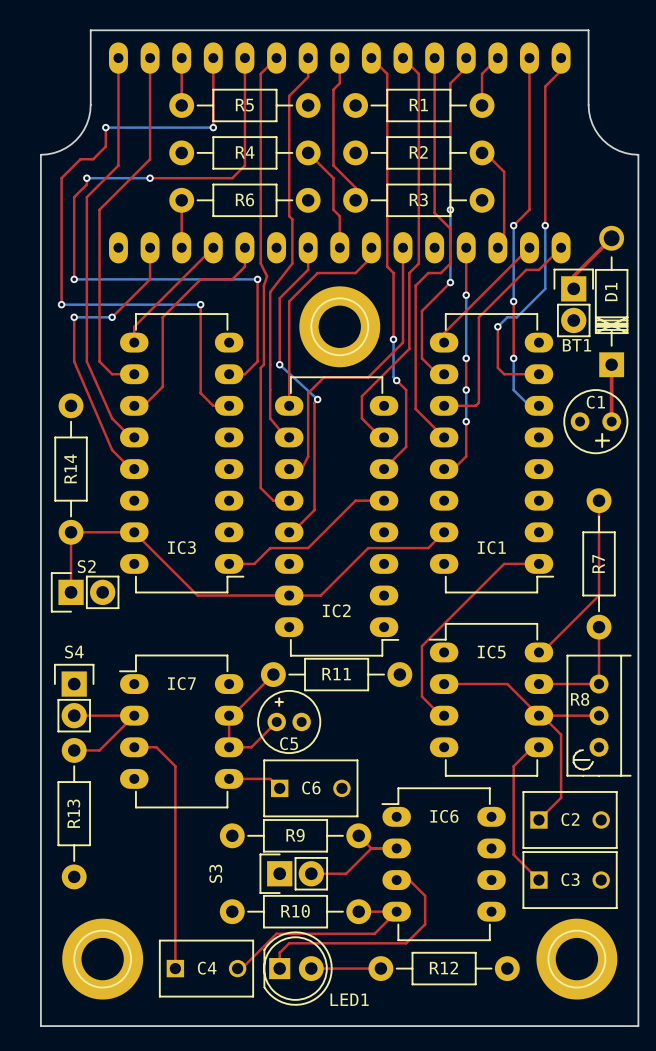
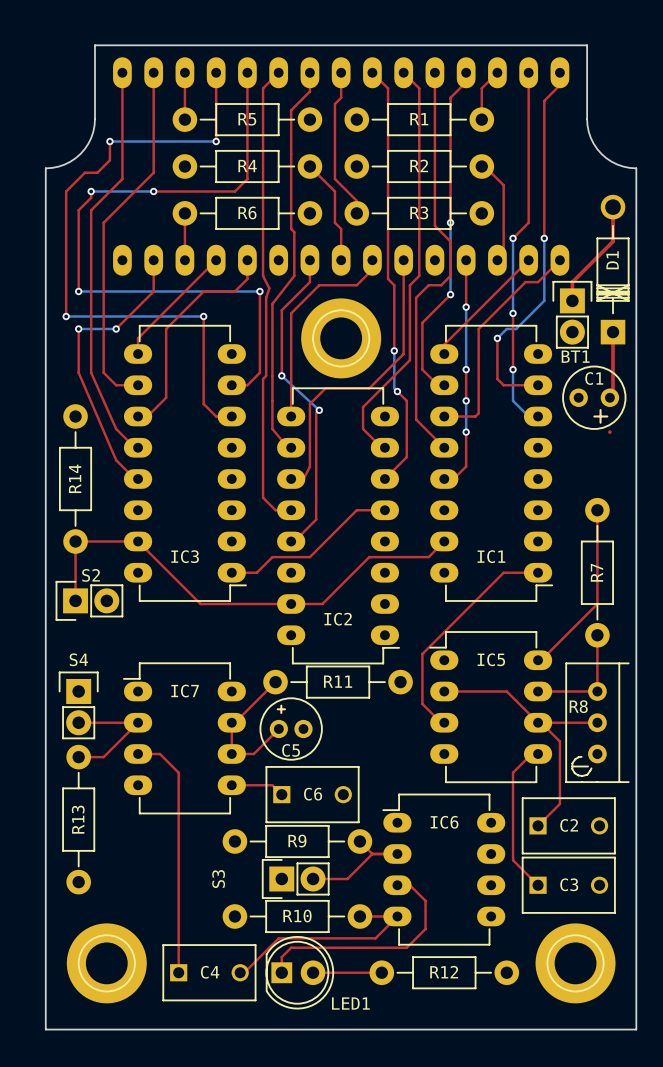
top track: (611, 238) (573, 276) -> (613, 207) (613, 241) (572, 282) (572, 288)
D1 position: (611, 301) -> (613, 269)
top track: none -> (613, 332) (613, 394) (609, 397)
top track: (611, 364) (611, 421) -> none
C1 position: (595, 421) -> (594, 397)

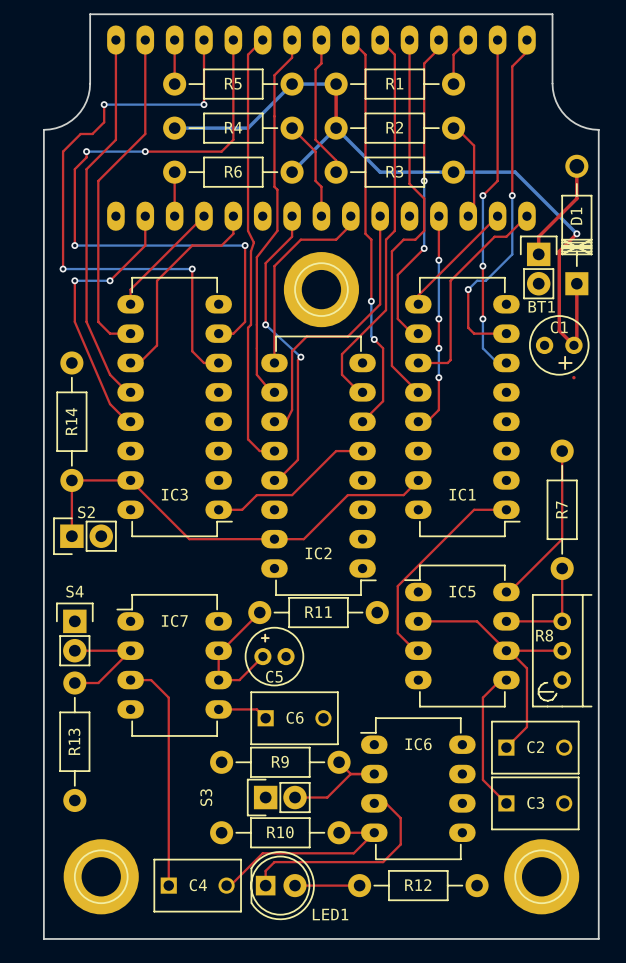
top track: none -> (336, 84) (336, 128)
bottom track: none -> (336, 84) (292, 84) (248, 128) (174, 128)
bottom track: none -> (292, 172) (336, 128) (380, 172) (515, 172) (576, 233)
top track: none -> (576, 233) (559, 251) (559, 330) (573, 345)
via: none -> (576, 233)

